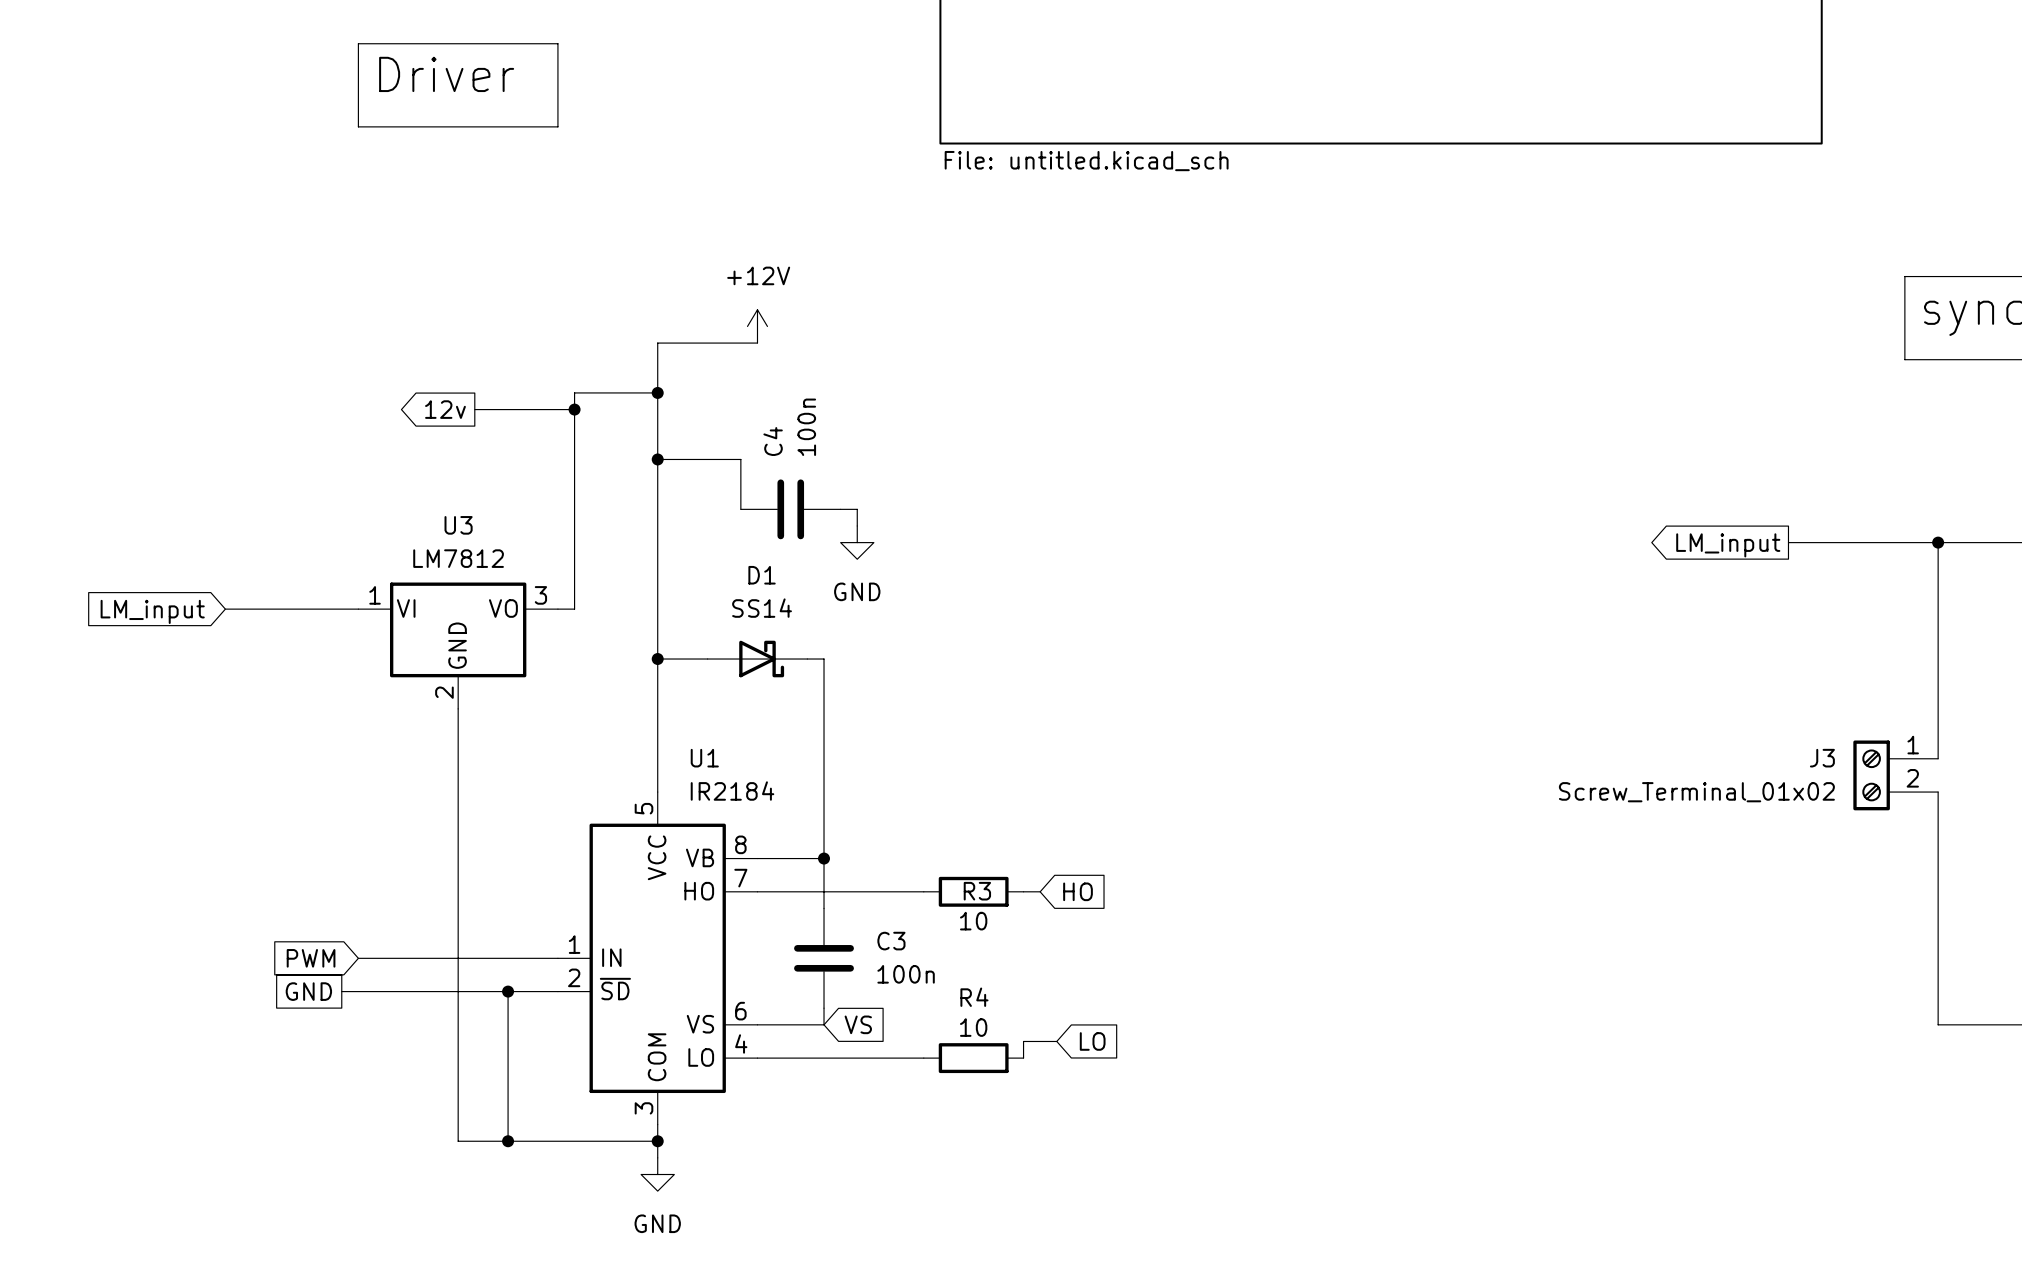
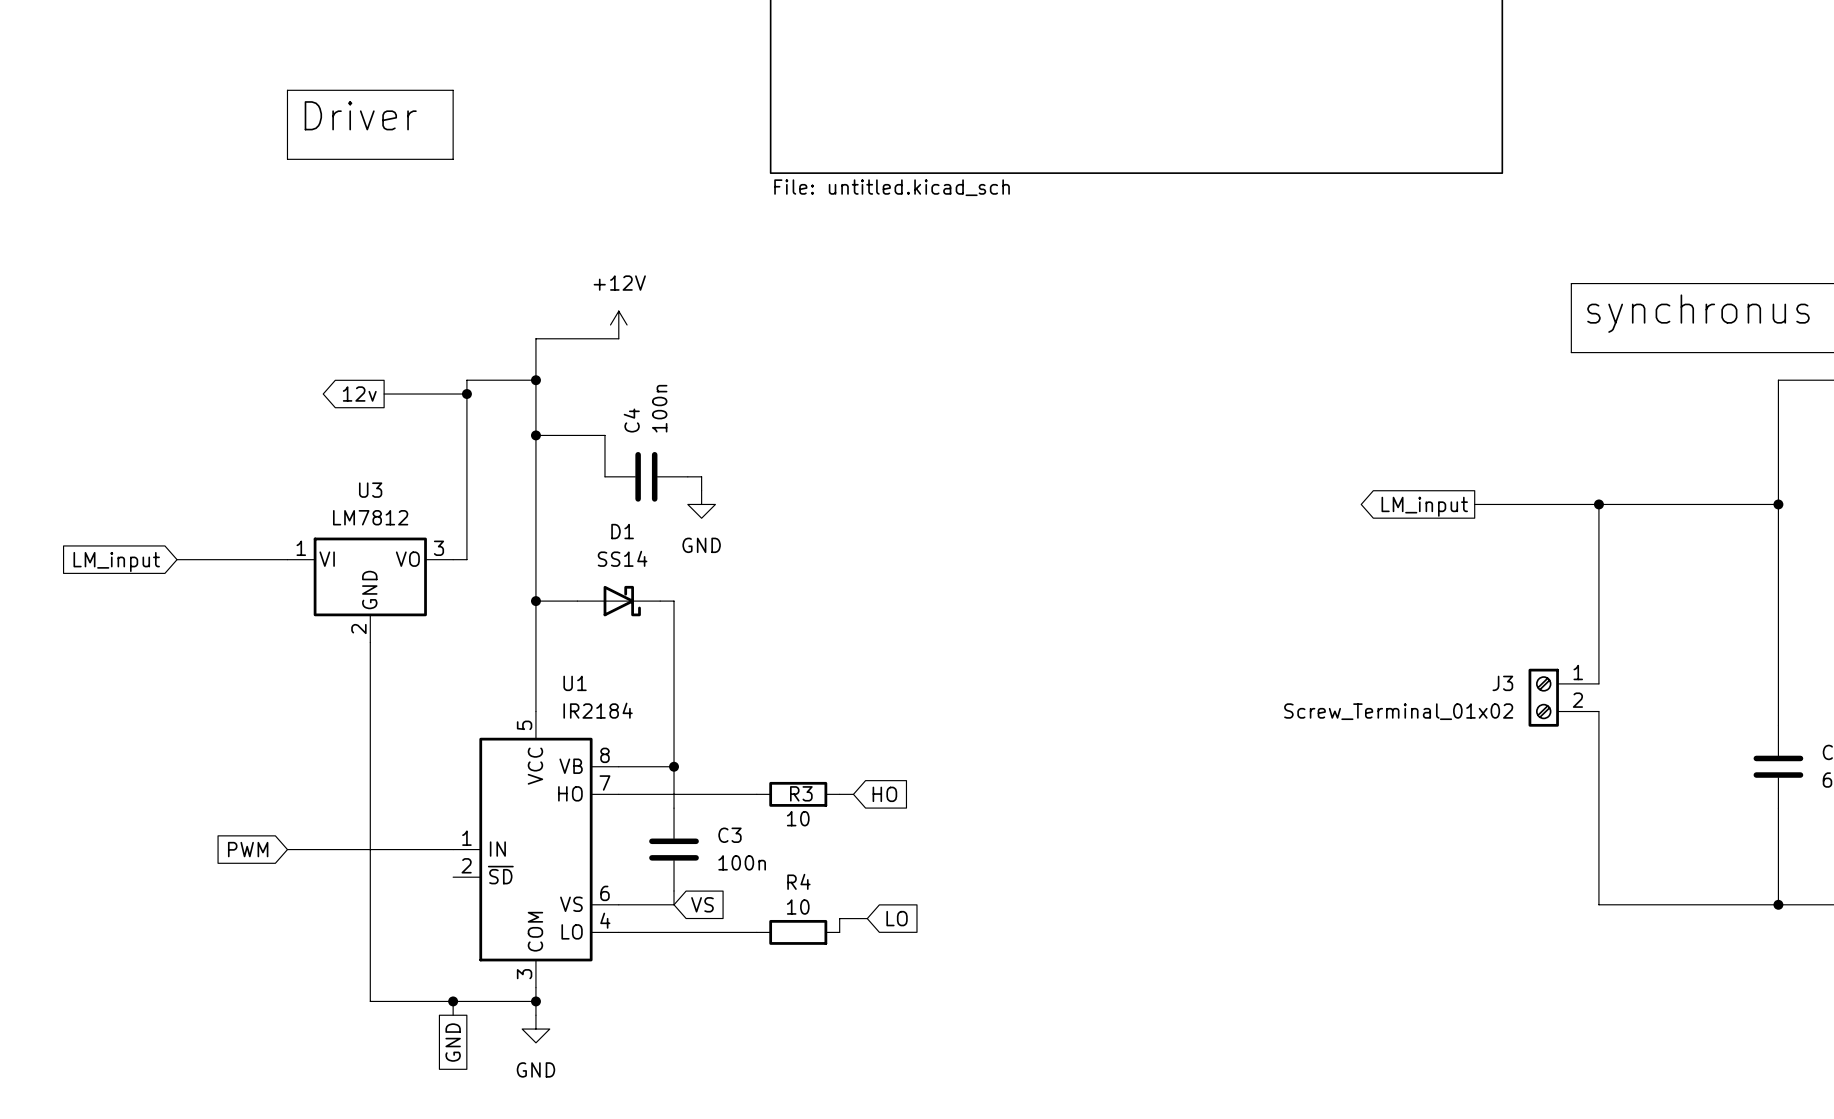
global label rotation: 0° (308, 991) -> 90° counterclockwise (453, 1042)
global label position: GND (308, 991) -> GND (453, 1042)
wire: (341, 991) (557, 991) -> none
wire: (508, 991) (508, 1141) -> none
junction: (508, 991) -> none
junction position: (508, 1141) -> (453, 1001)
wire: none -> (453, 1001) (453, 1015)

